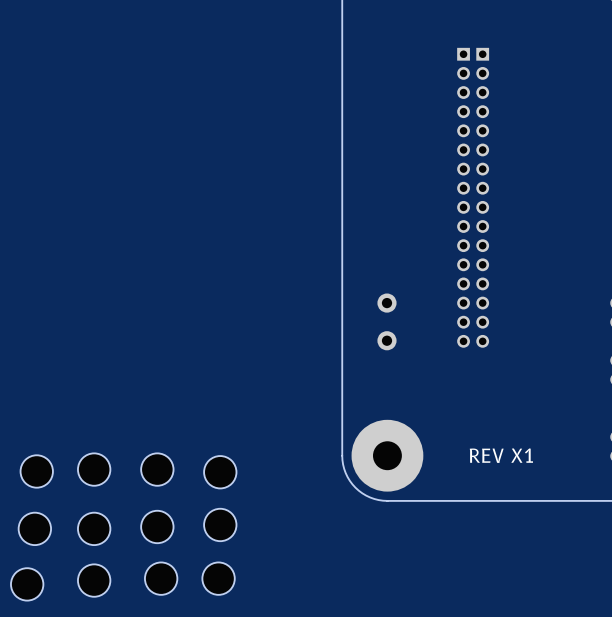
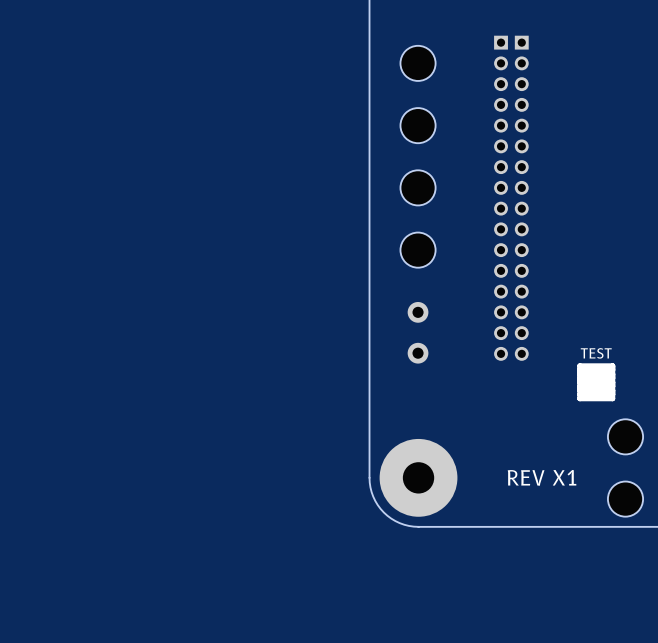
part: none -> (418, 63)
part: none -> (418, 125)
part: none -> (418, 187)
part: none -> (418, 250)
TEST: none -> (596, 382)
part: none -> (625, 436)
part: (94, 469) -> none
part: (157, 469) -> none
part: (36, 471) -> none
part: (220, 472) -> none
part: none -> (625, 499)
part: (220, 524) -> none
part: (157, 526) -> none
part: (34, 528) -> none
part: (94, 528) -> none
part: (161, 578) -> none
part: (218, 578) -> none
part: (94, 580) -> none
part: (27, 584) -> none

